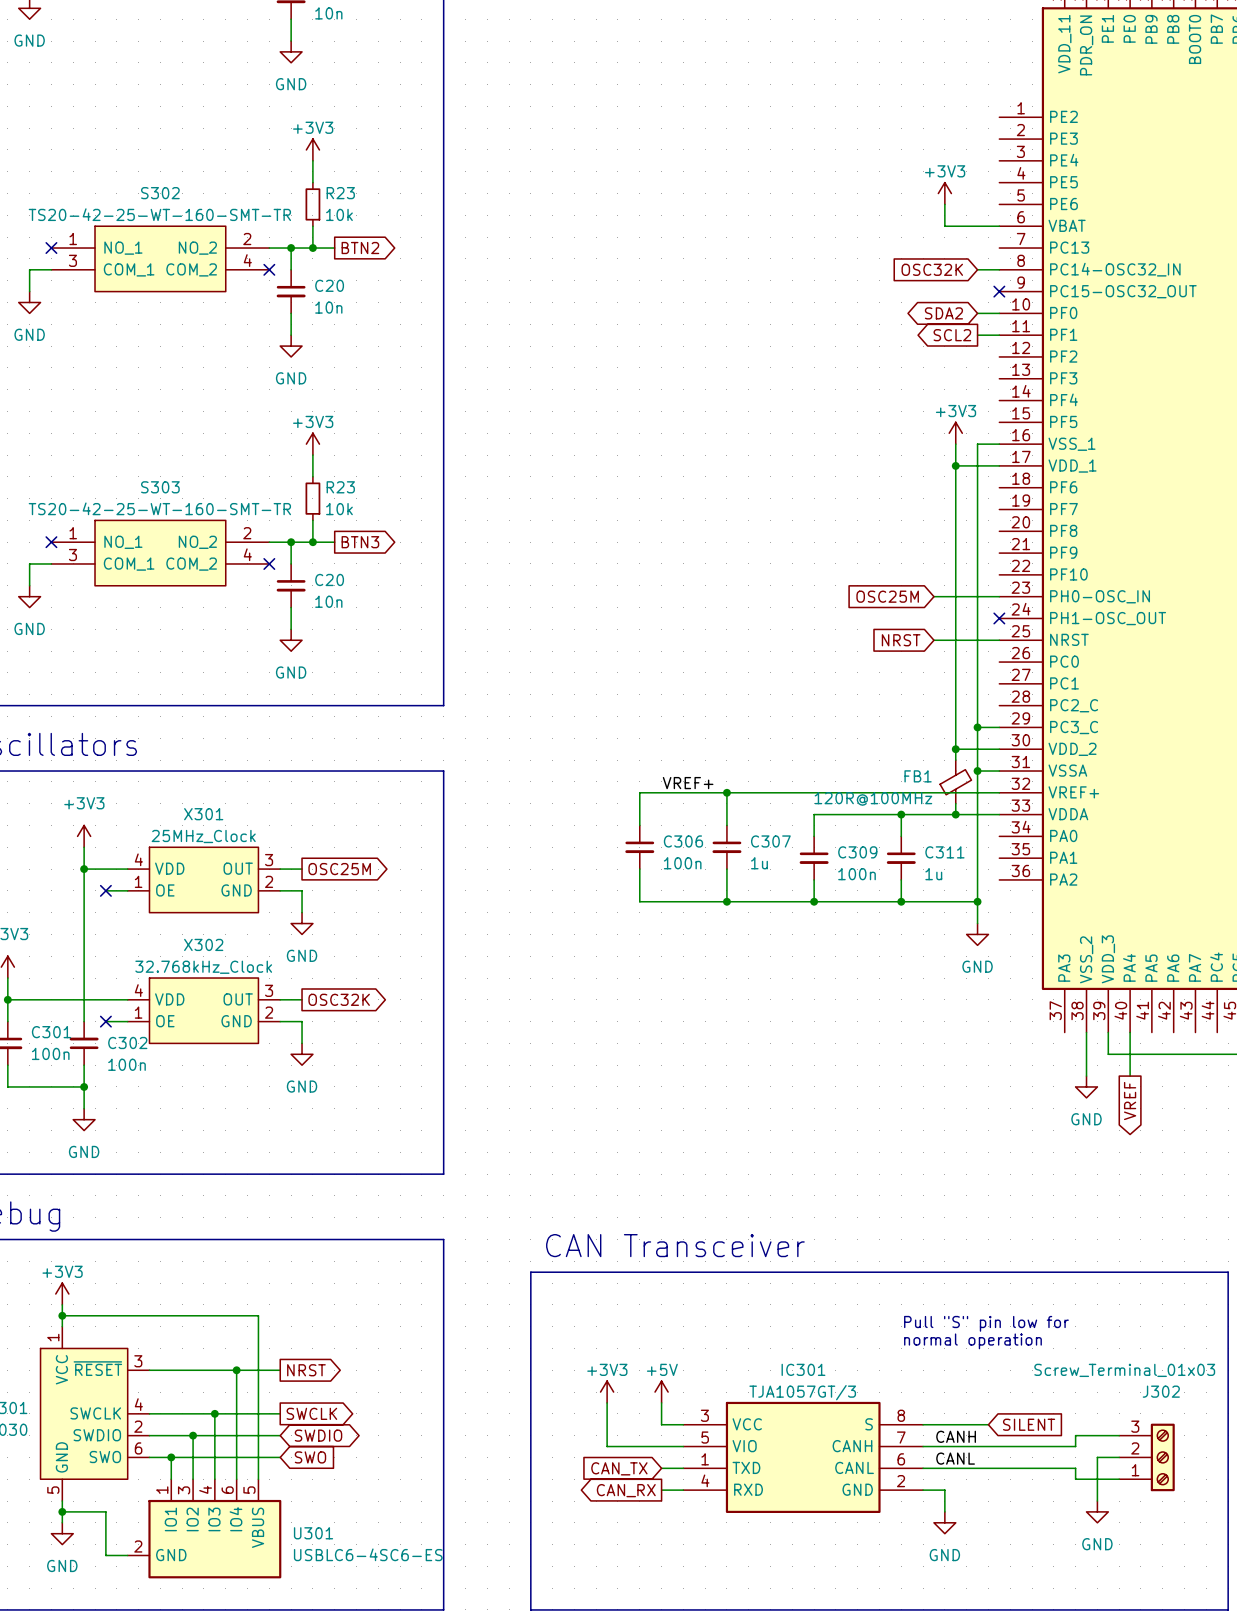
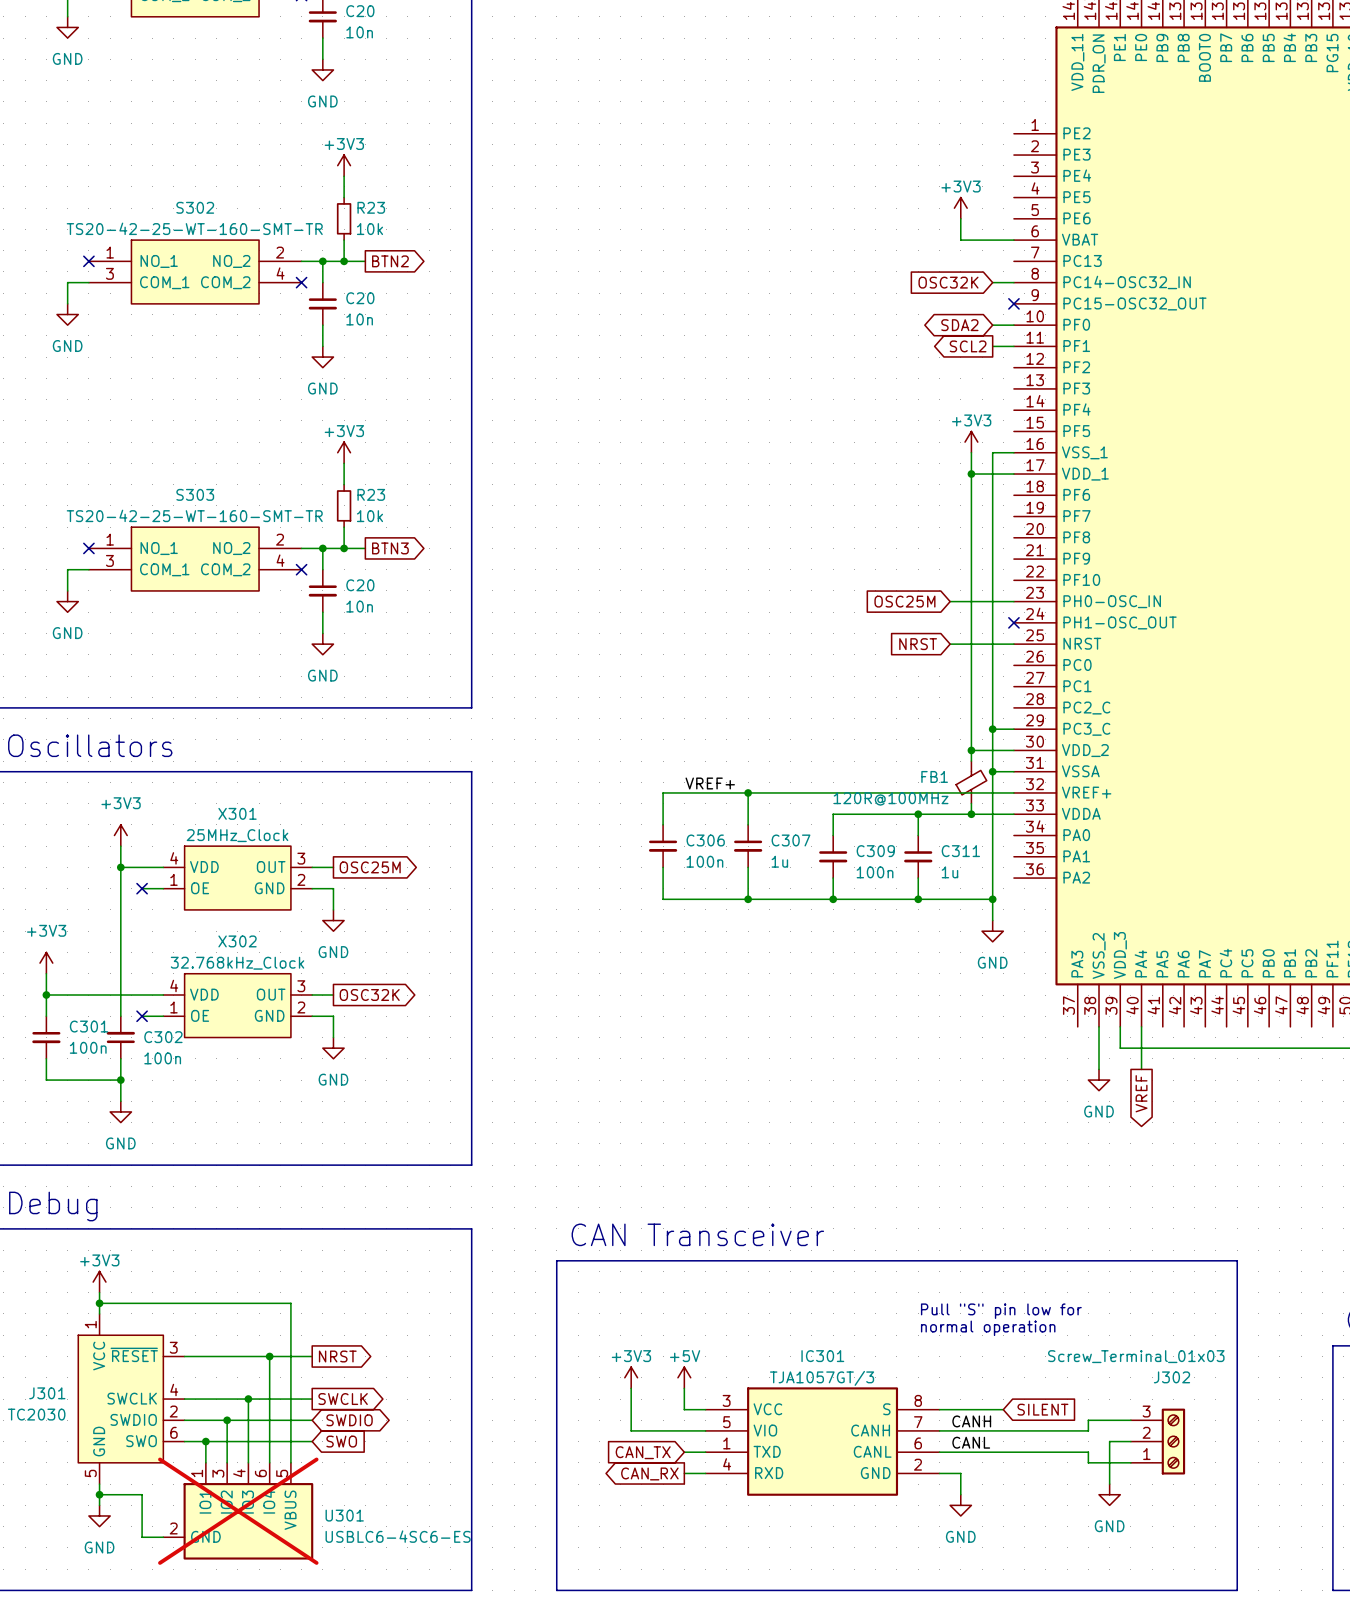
U301 do-not-place cross: none -> (238, 1511)

